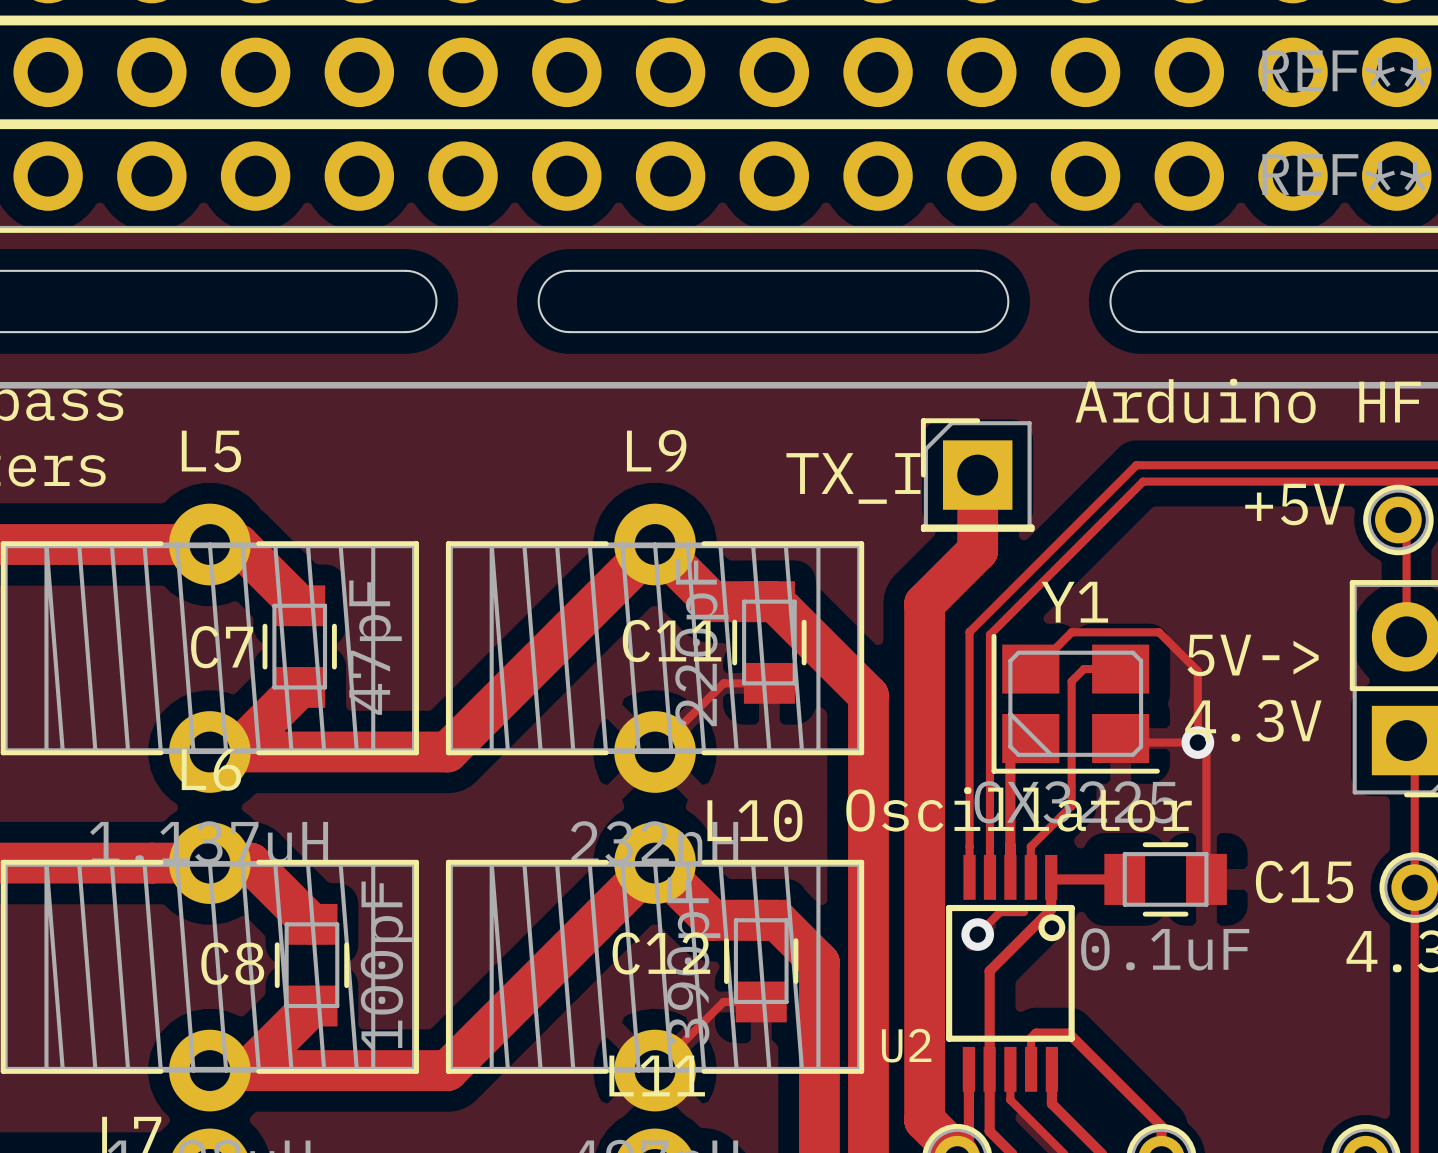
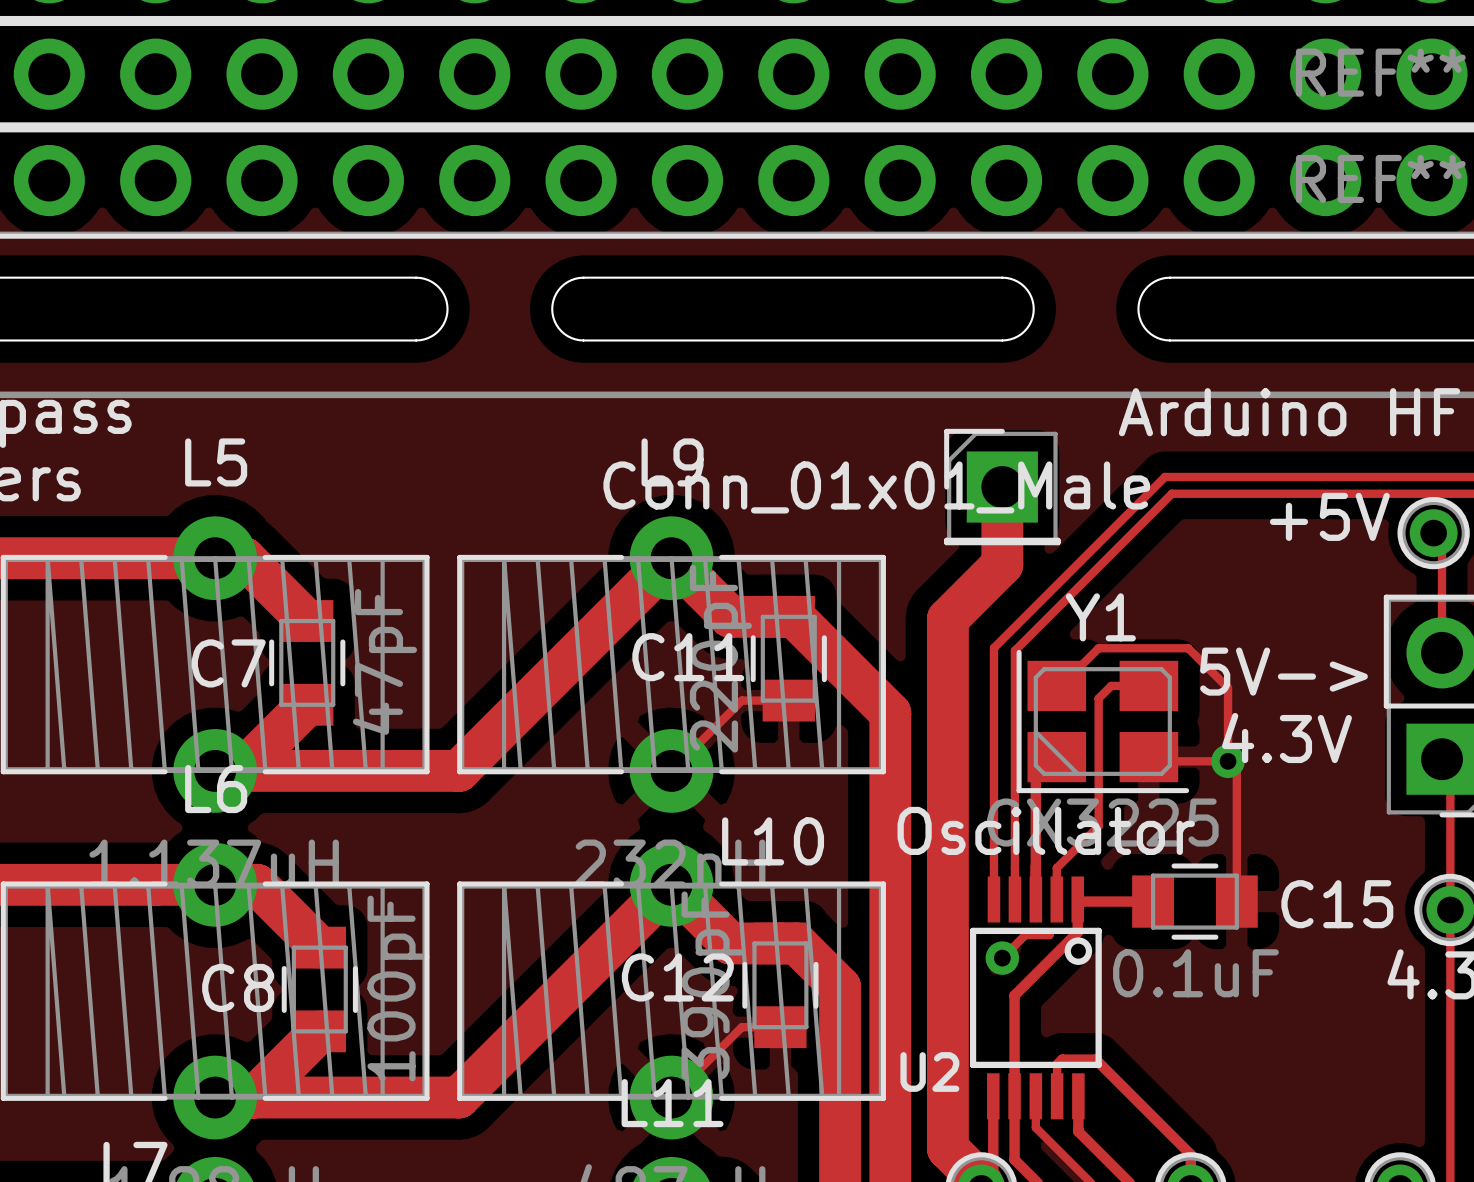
part value: TX_I (853, 478) -> Conn_01x01_Male (876, 487)

